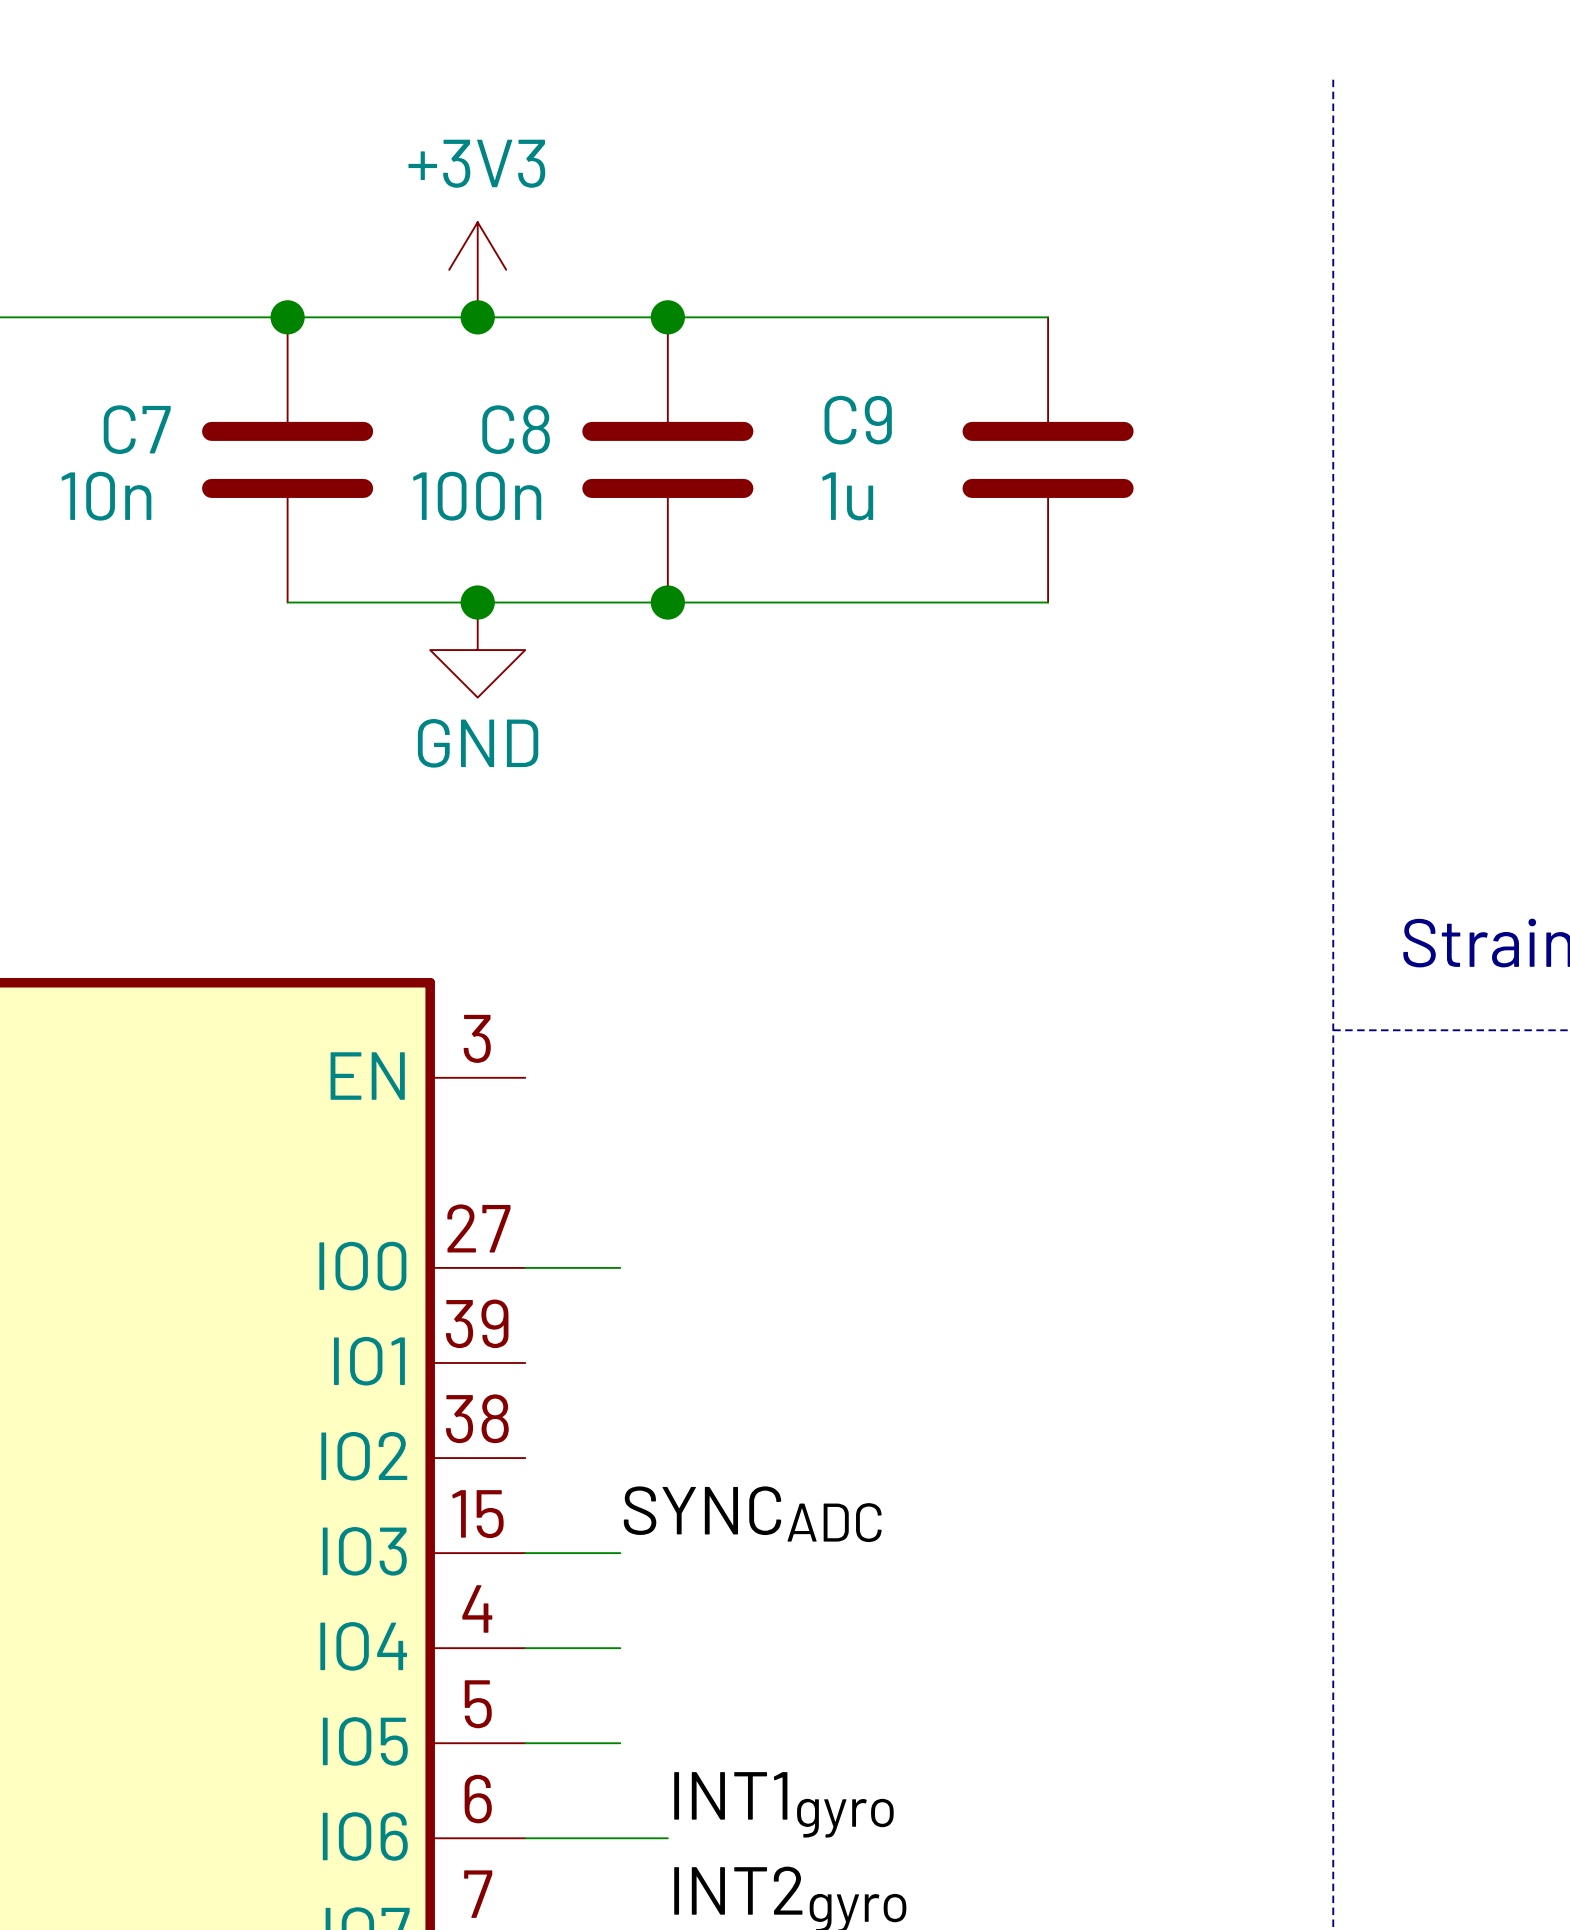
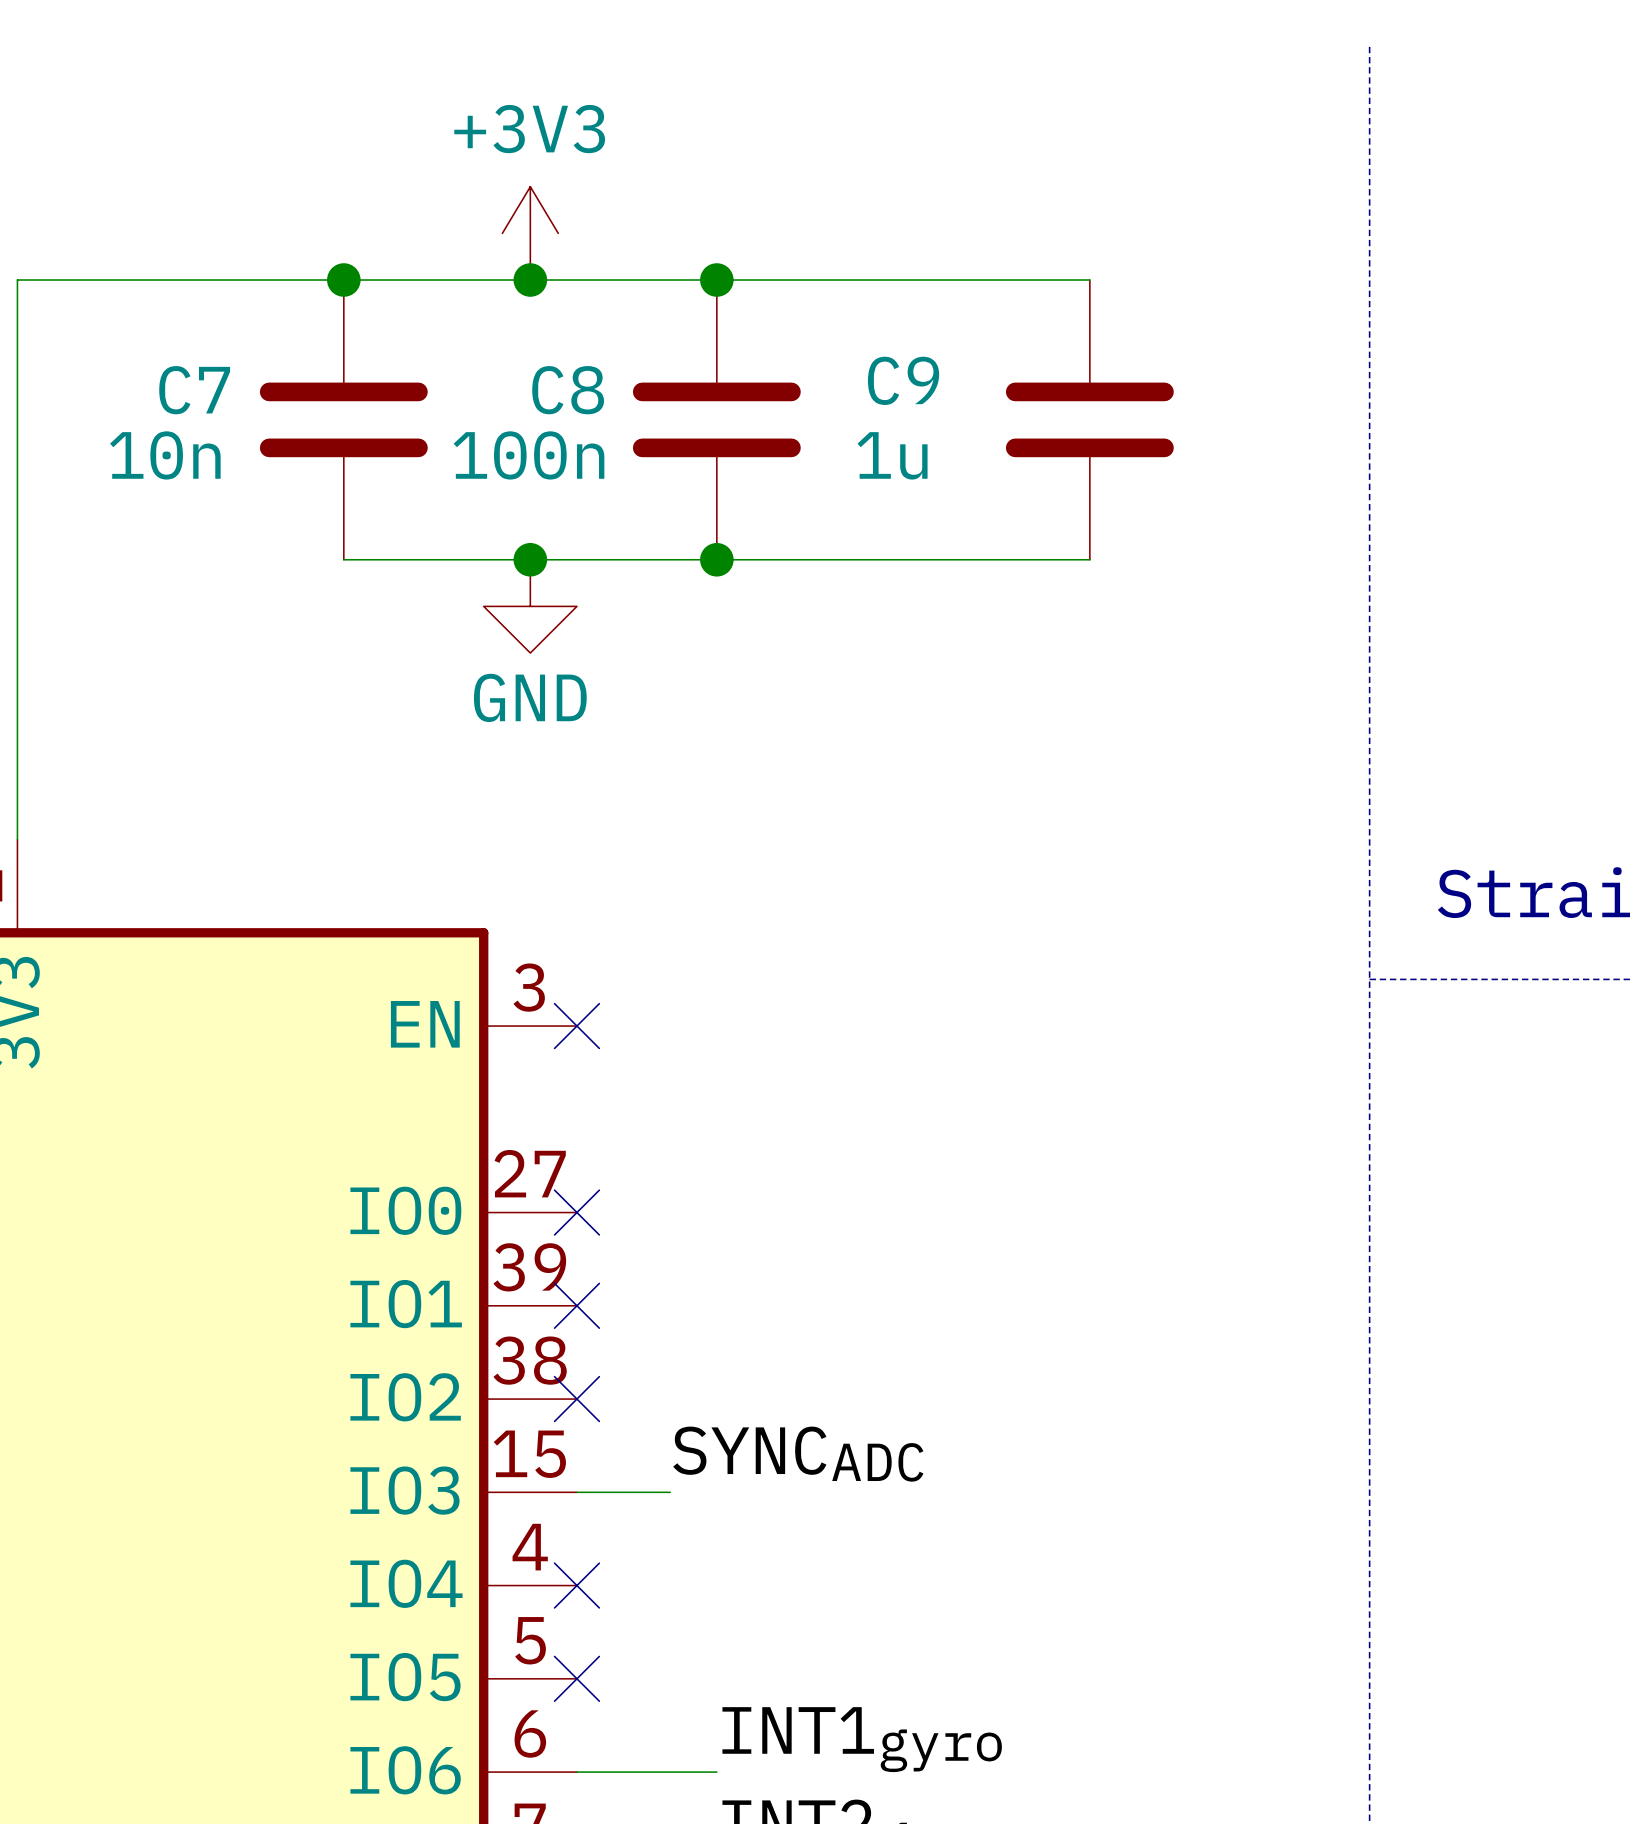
no-connect mark: none -> (576, 1026)
wire: (525, 1267) (620, 1267) -> none
no-connect mark: none -> (576, 1212)
no-connect mark: none -> (576, 1305)
no-connect mark: none -> (576, 1399)
wire: (525, 1648) (620, 1648) -> none
no-connect mark: none -> (576, 1585)
wire: (525, 1743) (620, 1743) -> none
no-connect mark: none -> (576, 1678)

